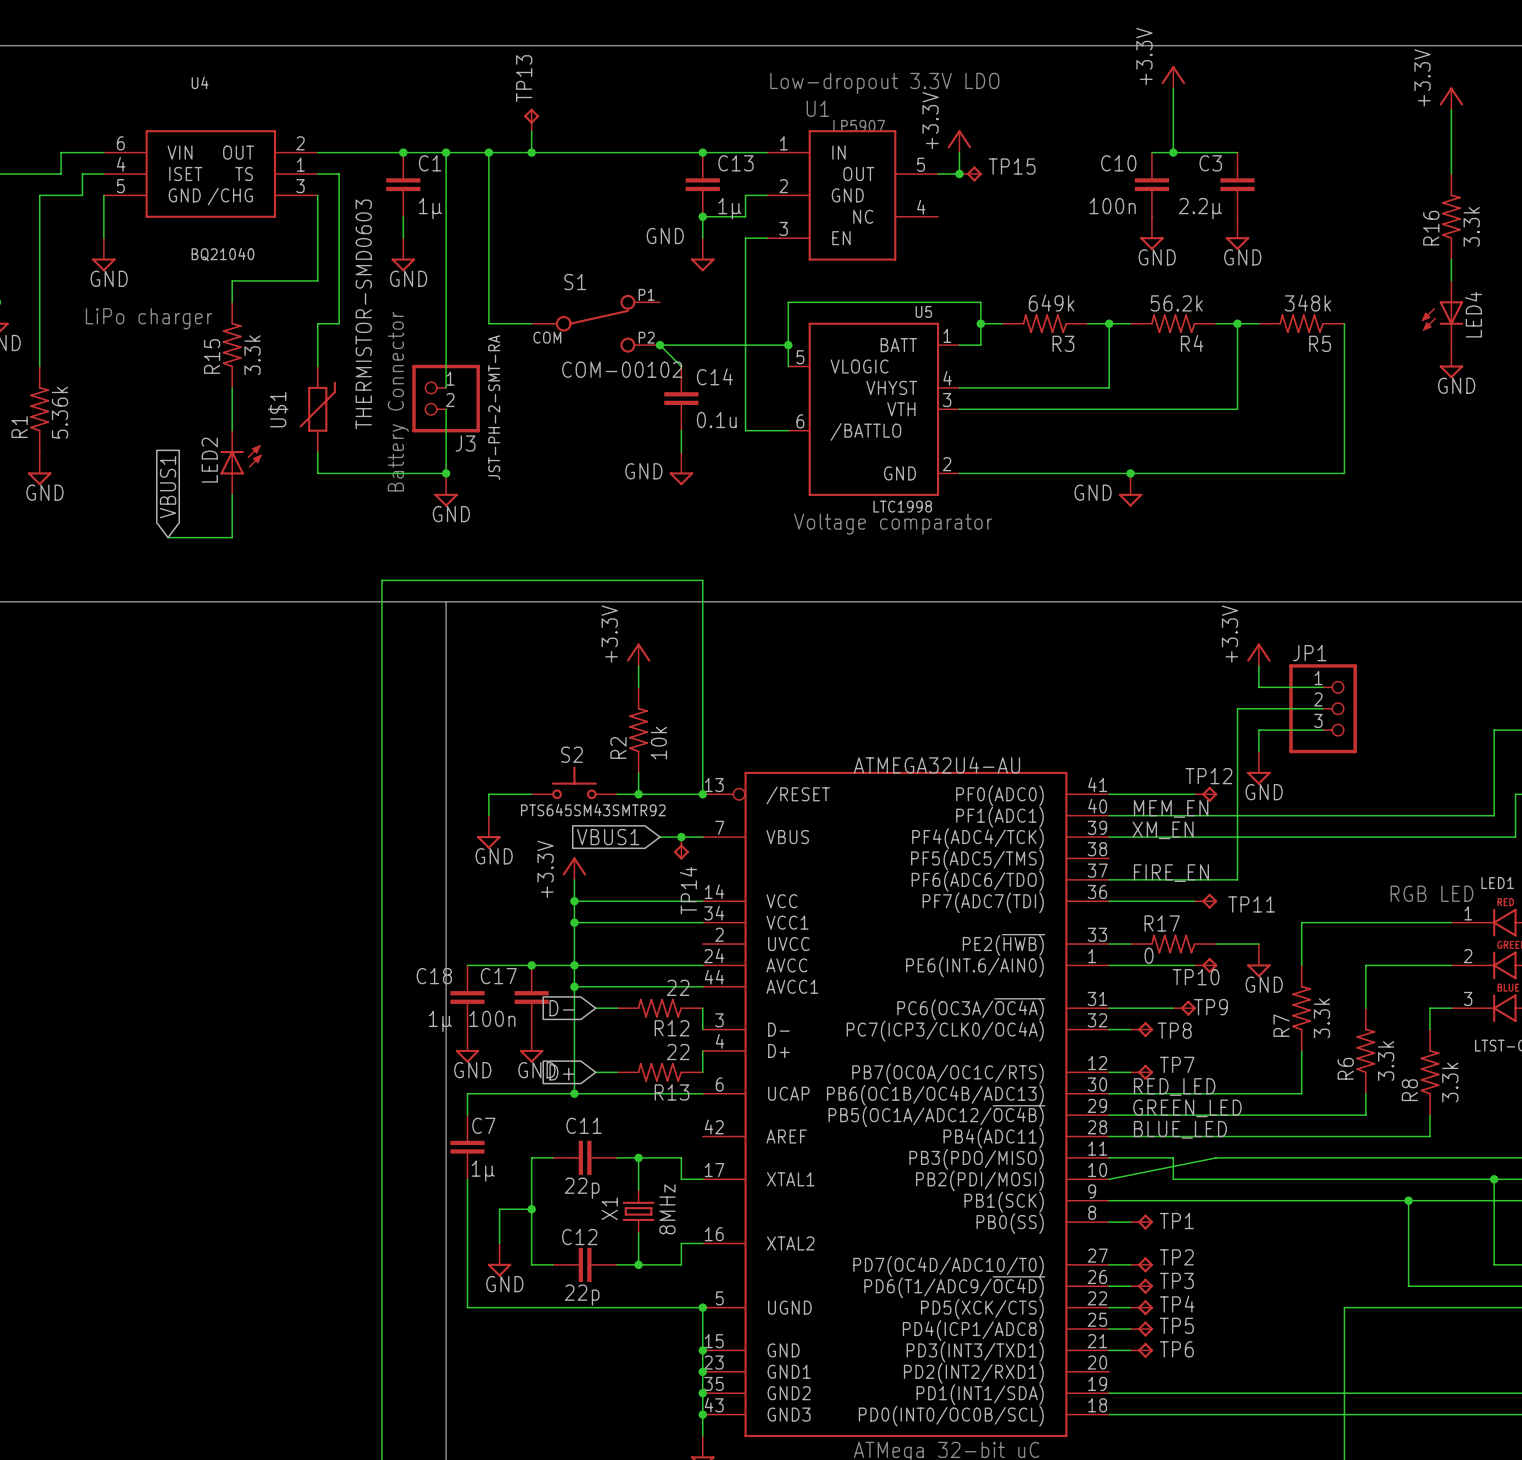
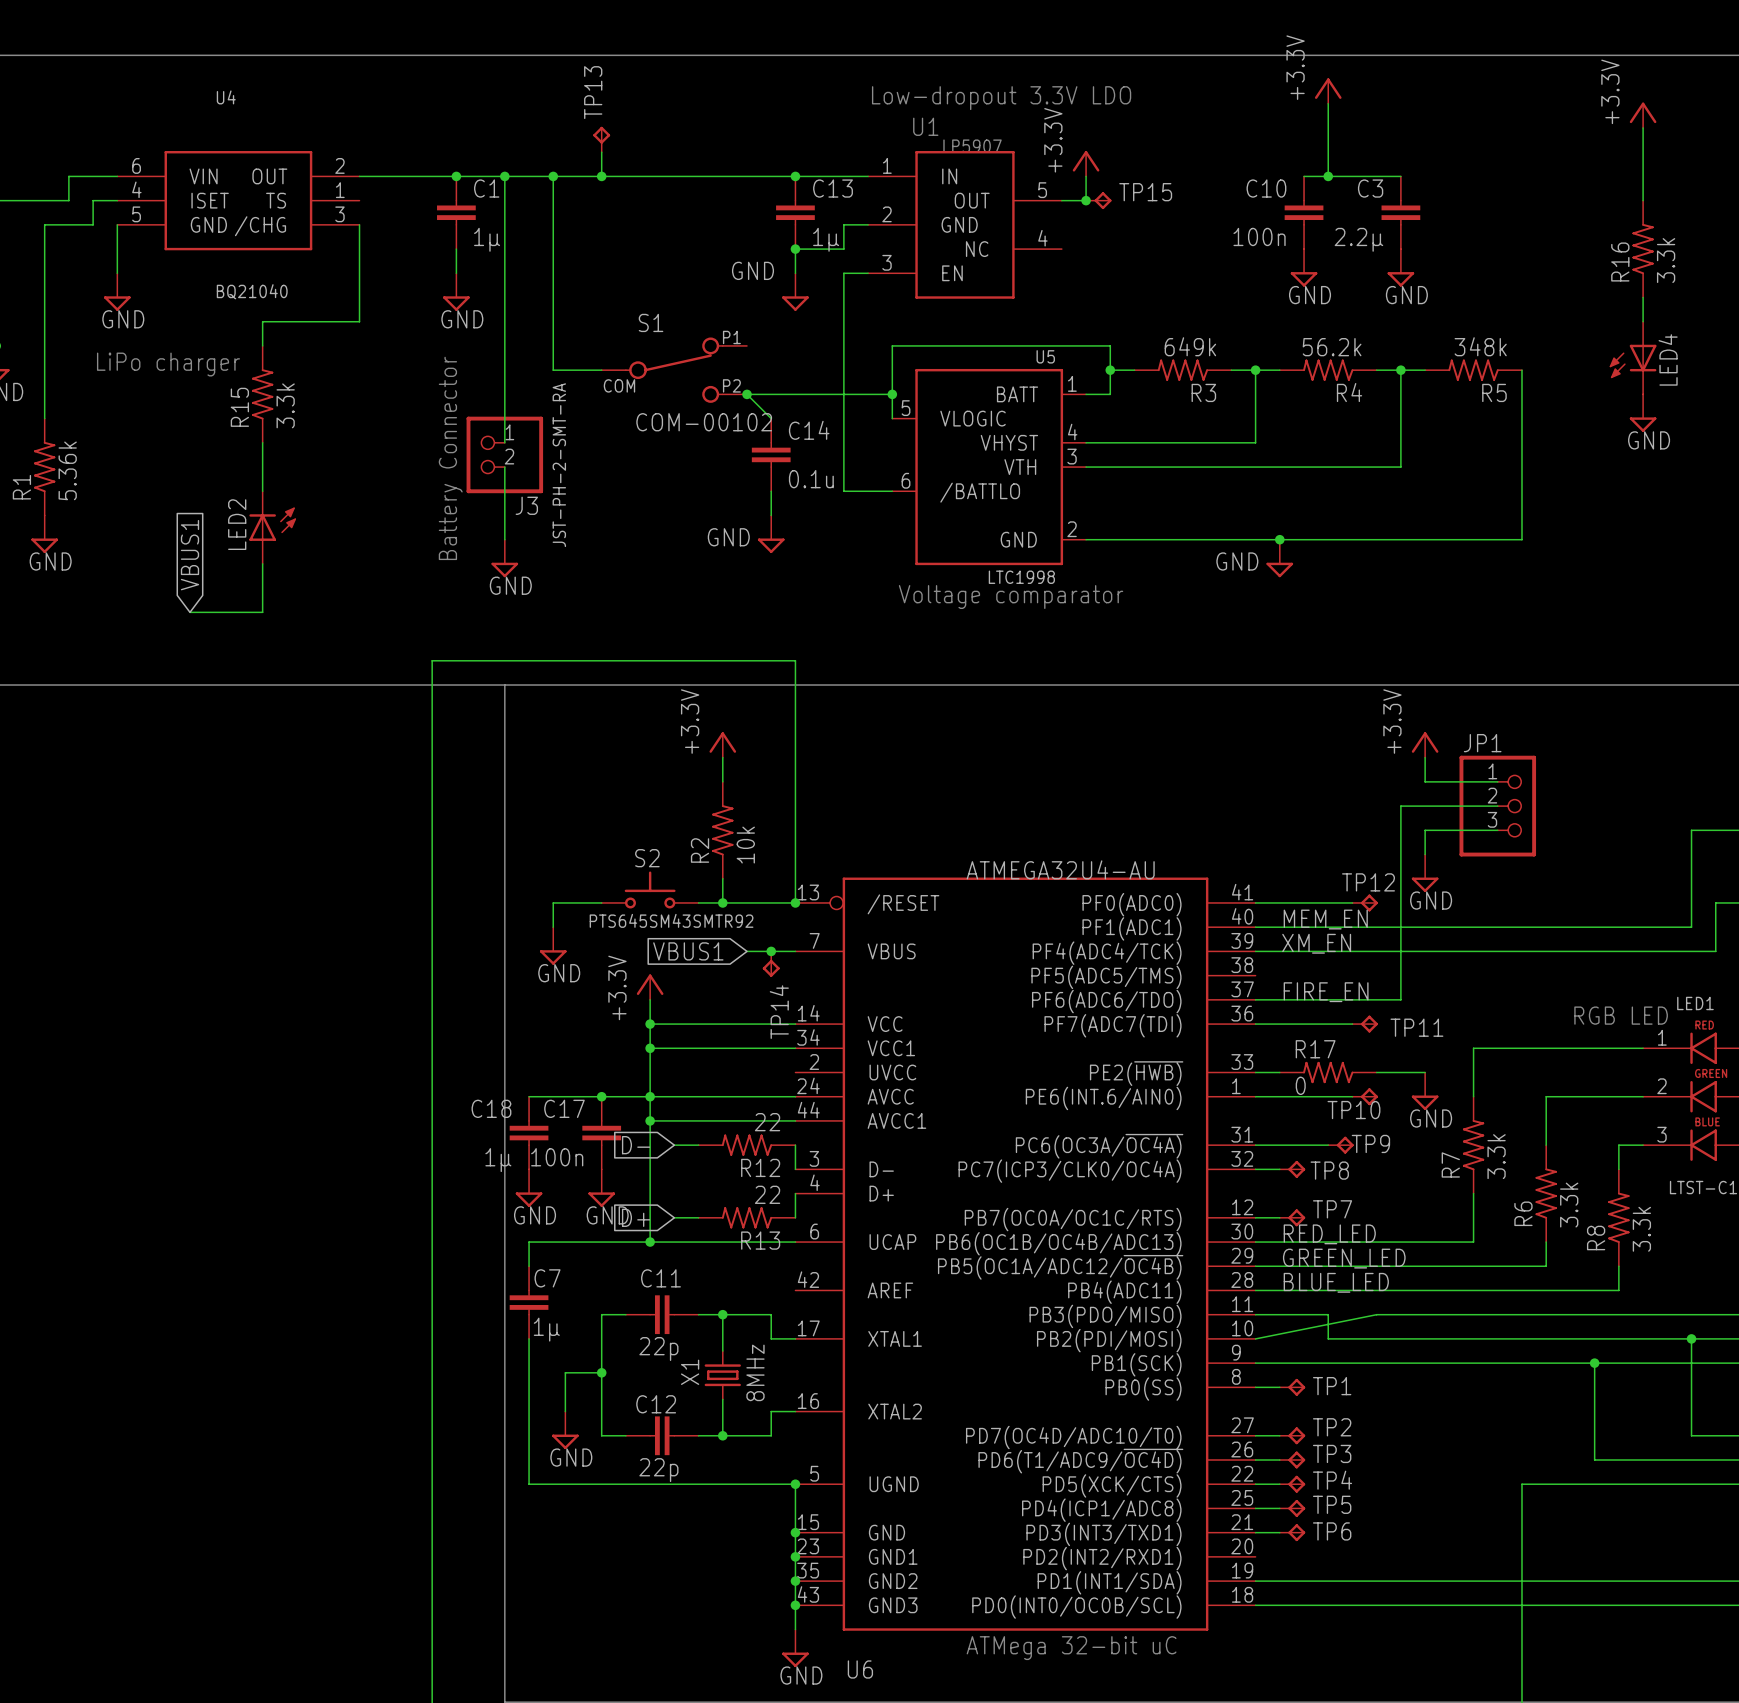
wire: (317, 174) (339, 174) (339, 323) (317, 323) (317, 366) -> none
U$1: THERMISTOR-SMD0603 (317, 409) -> none
wire: (317, 452) (317, 473) (446, 473) -> none
junction: (446, 473) -> none

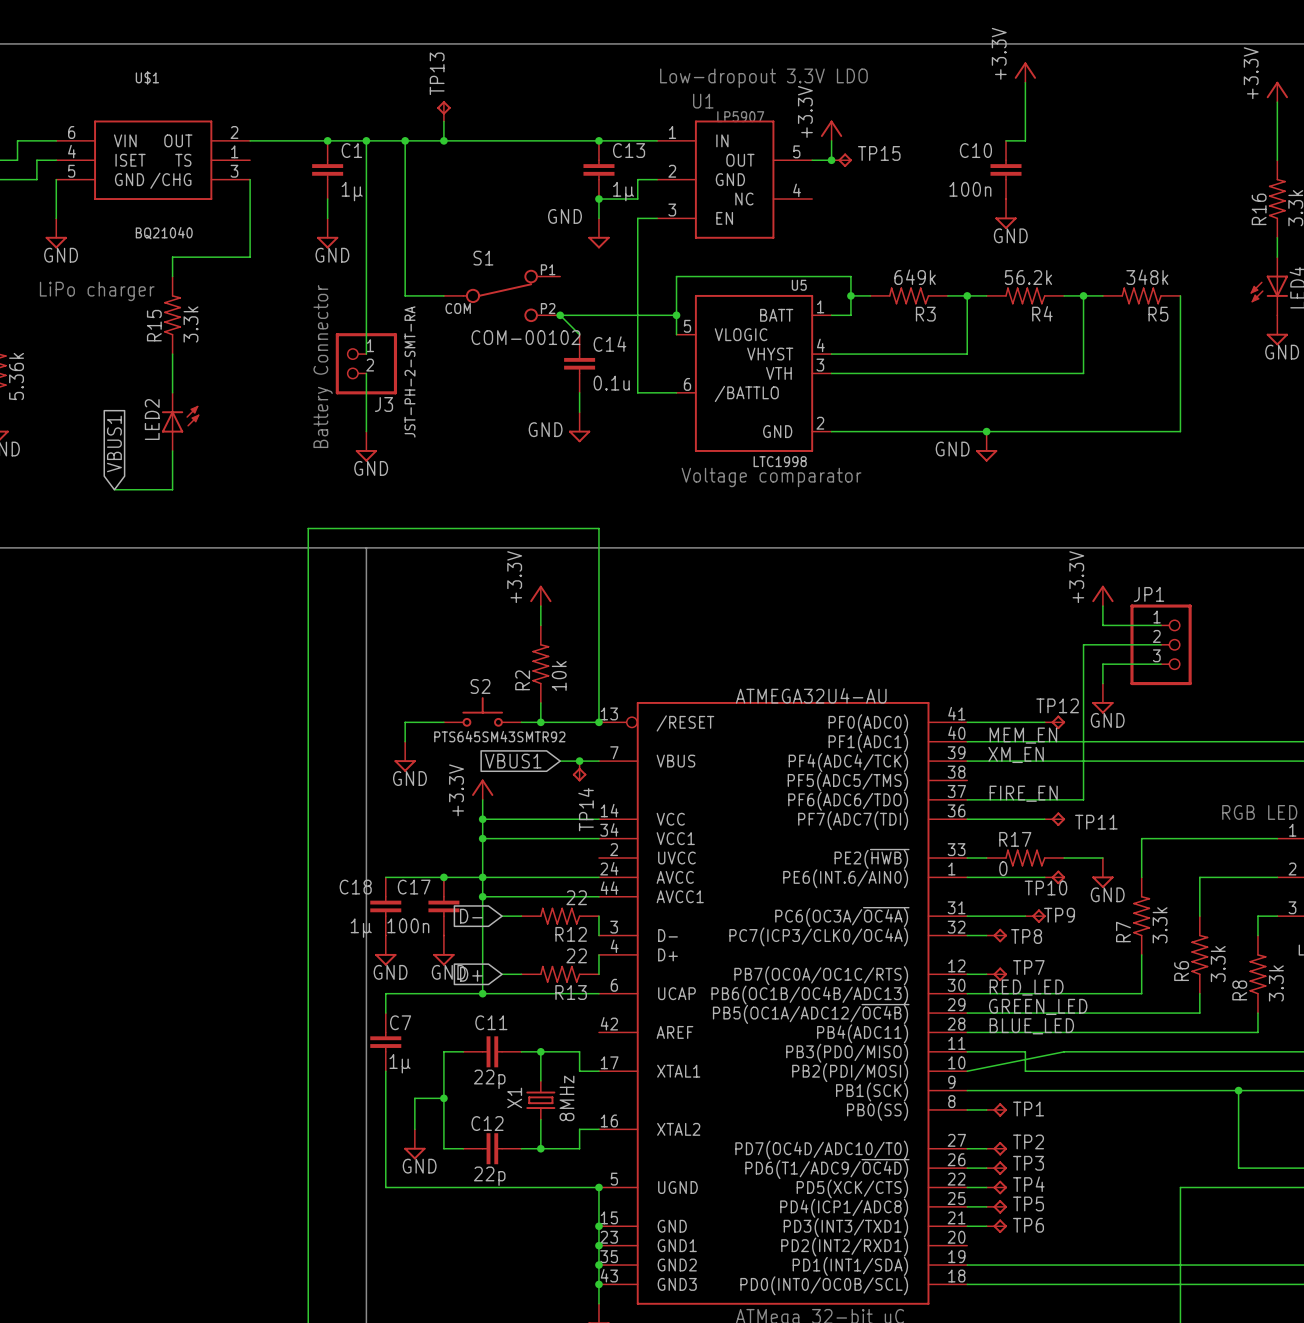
U4 name: U4 (226, 97) -> U$1 (147, 77)
wire: (1328, 176) (1400, 176) -> none
junction: (1328, 176) -> none
C3: 2.2µ (1400, 212) -> none
power symbol: GND (1400, 267) -> none

